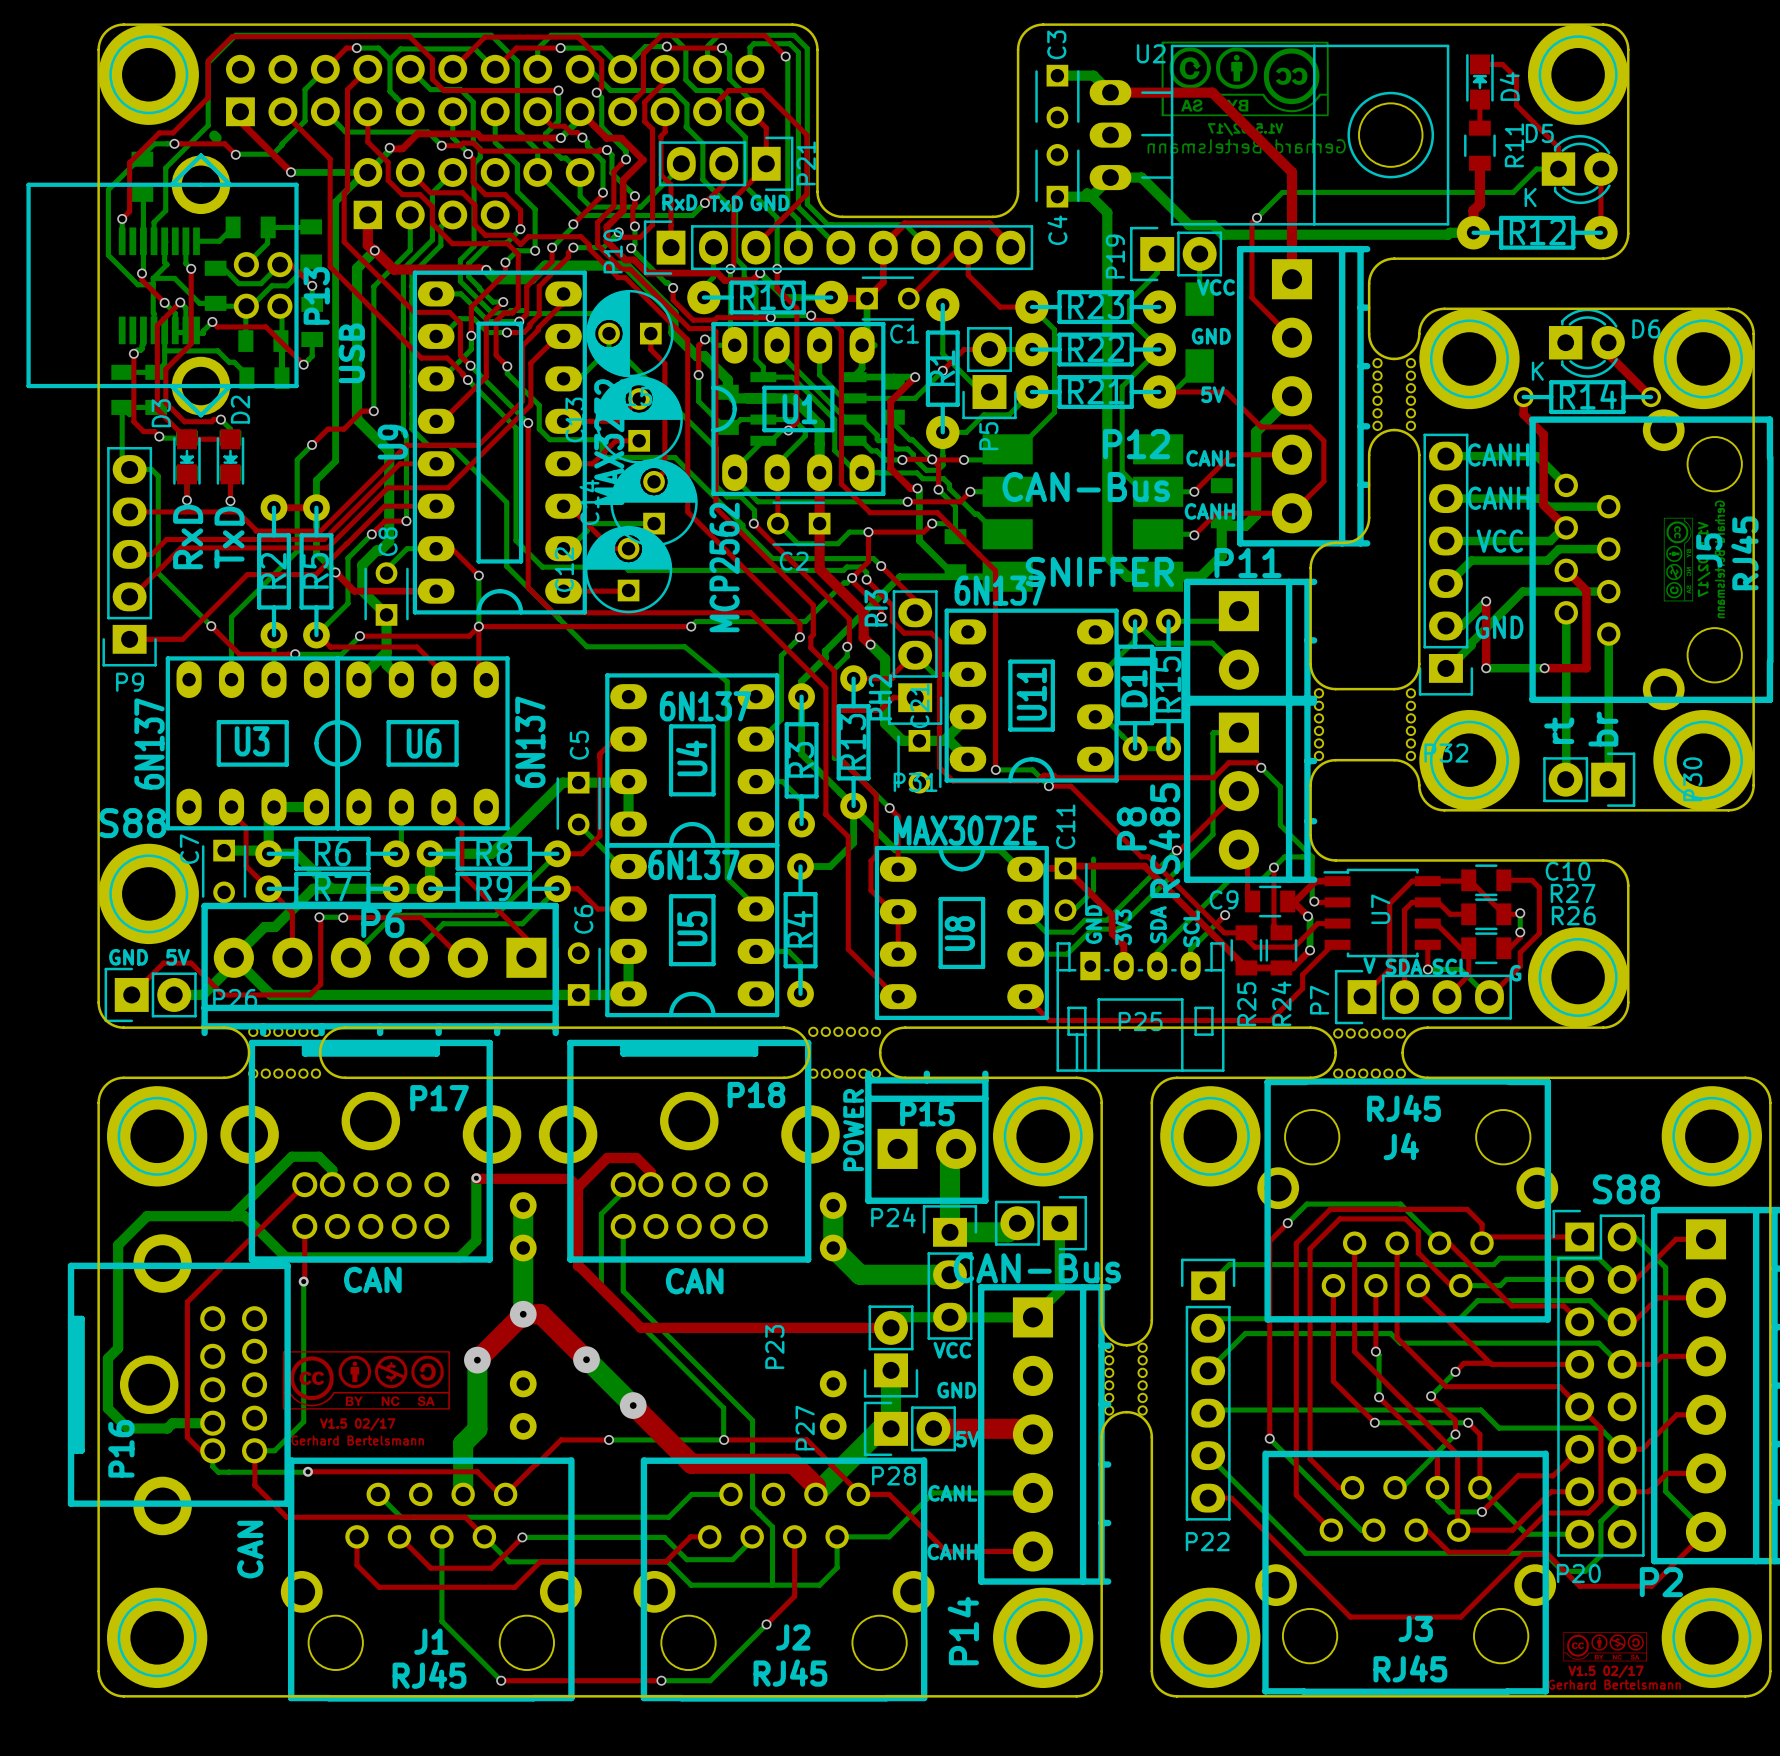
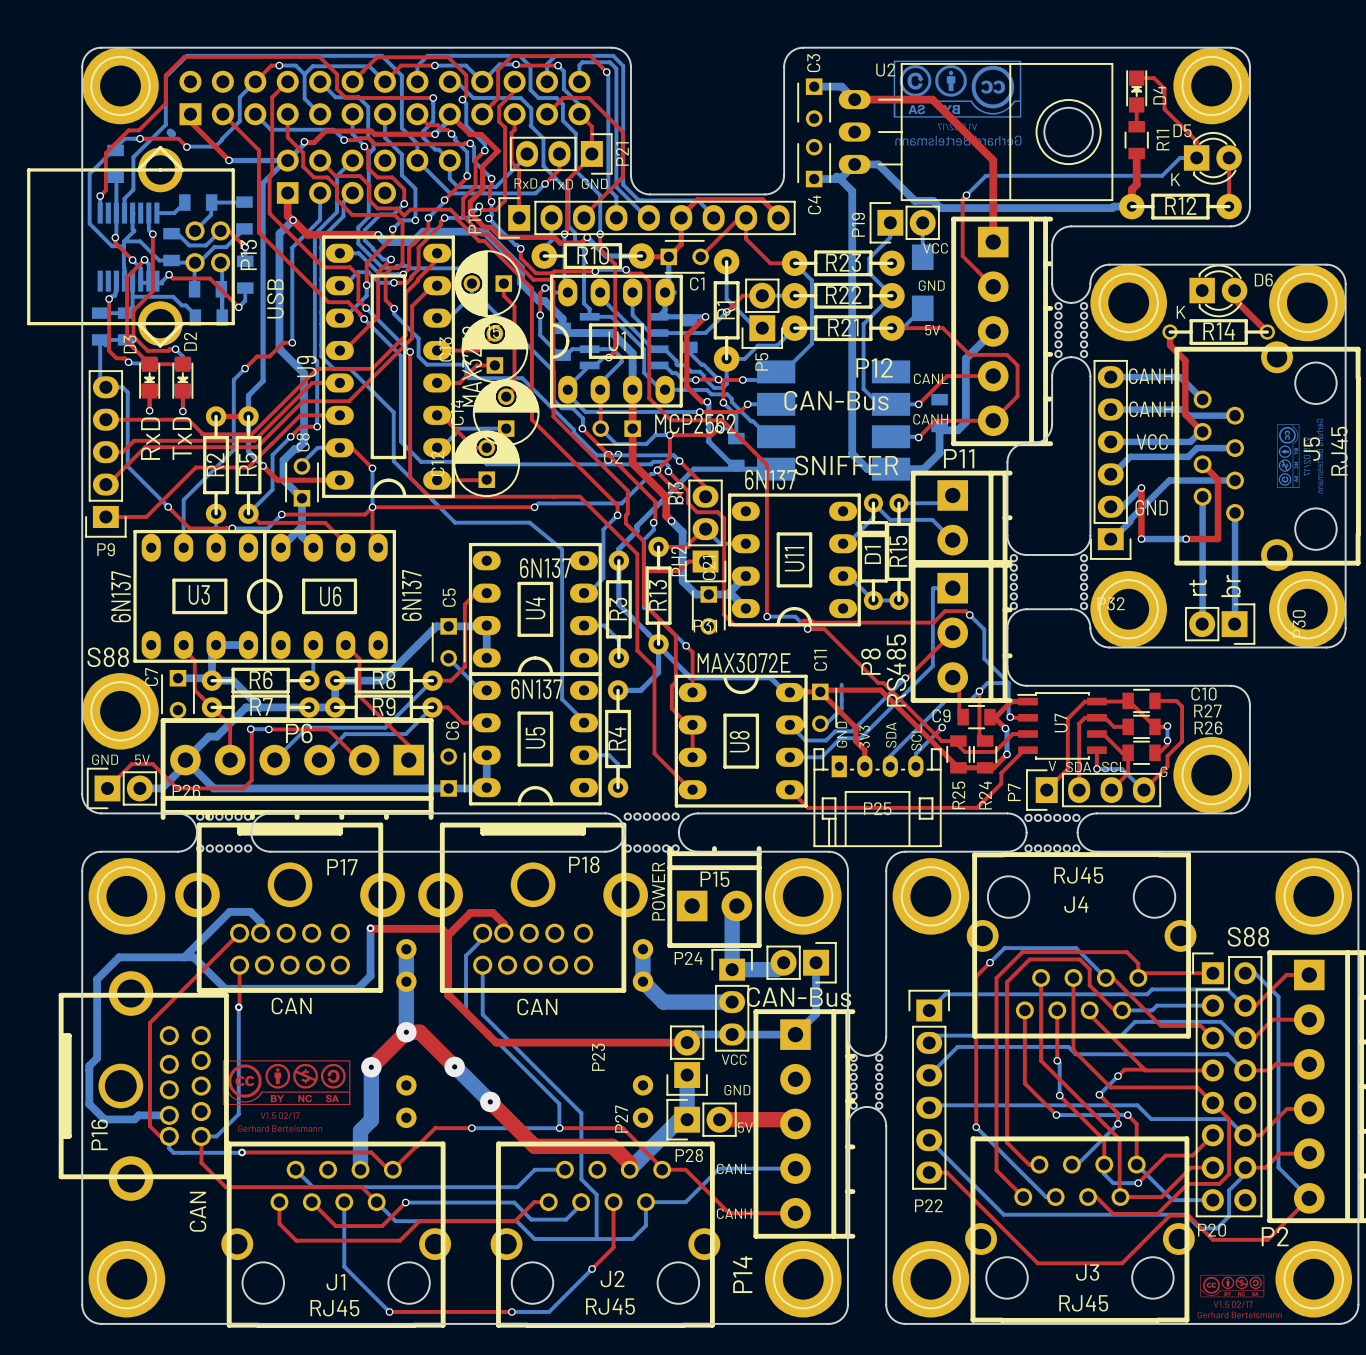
U1 value rotation: 0° (724, 567) -> 90° clockwise (695, 423)
U1 value position: MCP2562 (724, 567) -> MCP2562 (695, 423)

